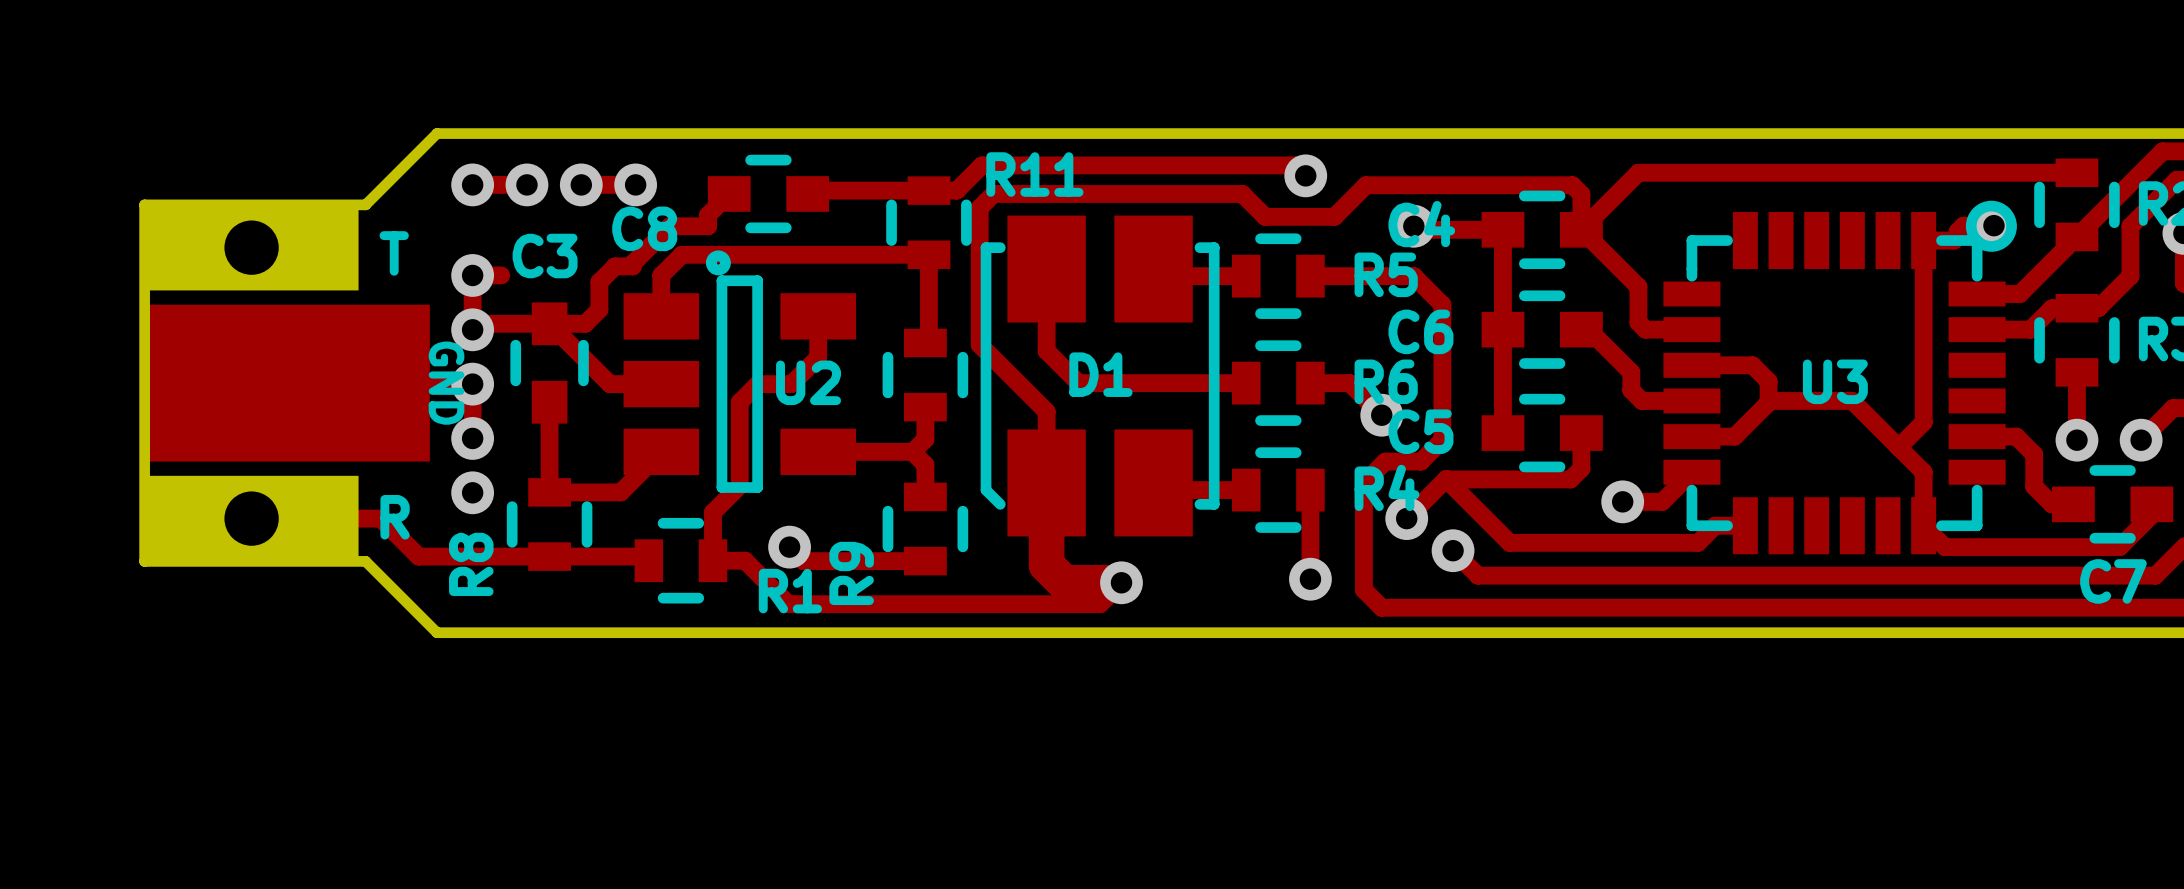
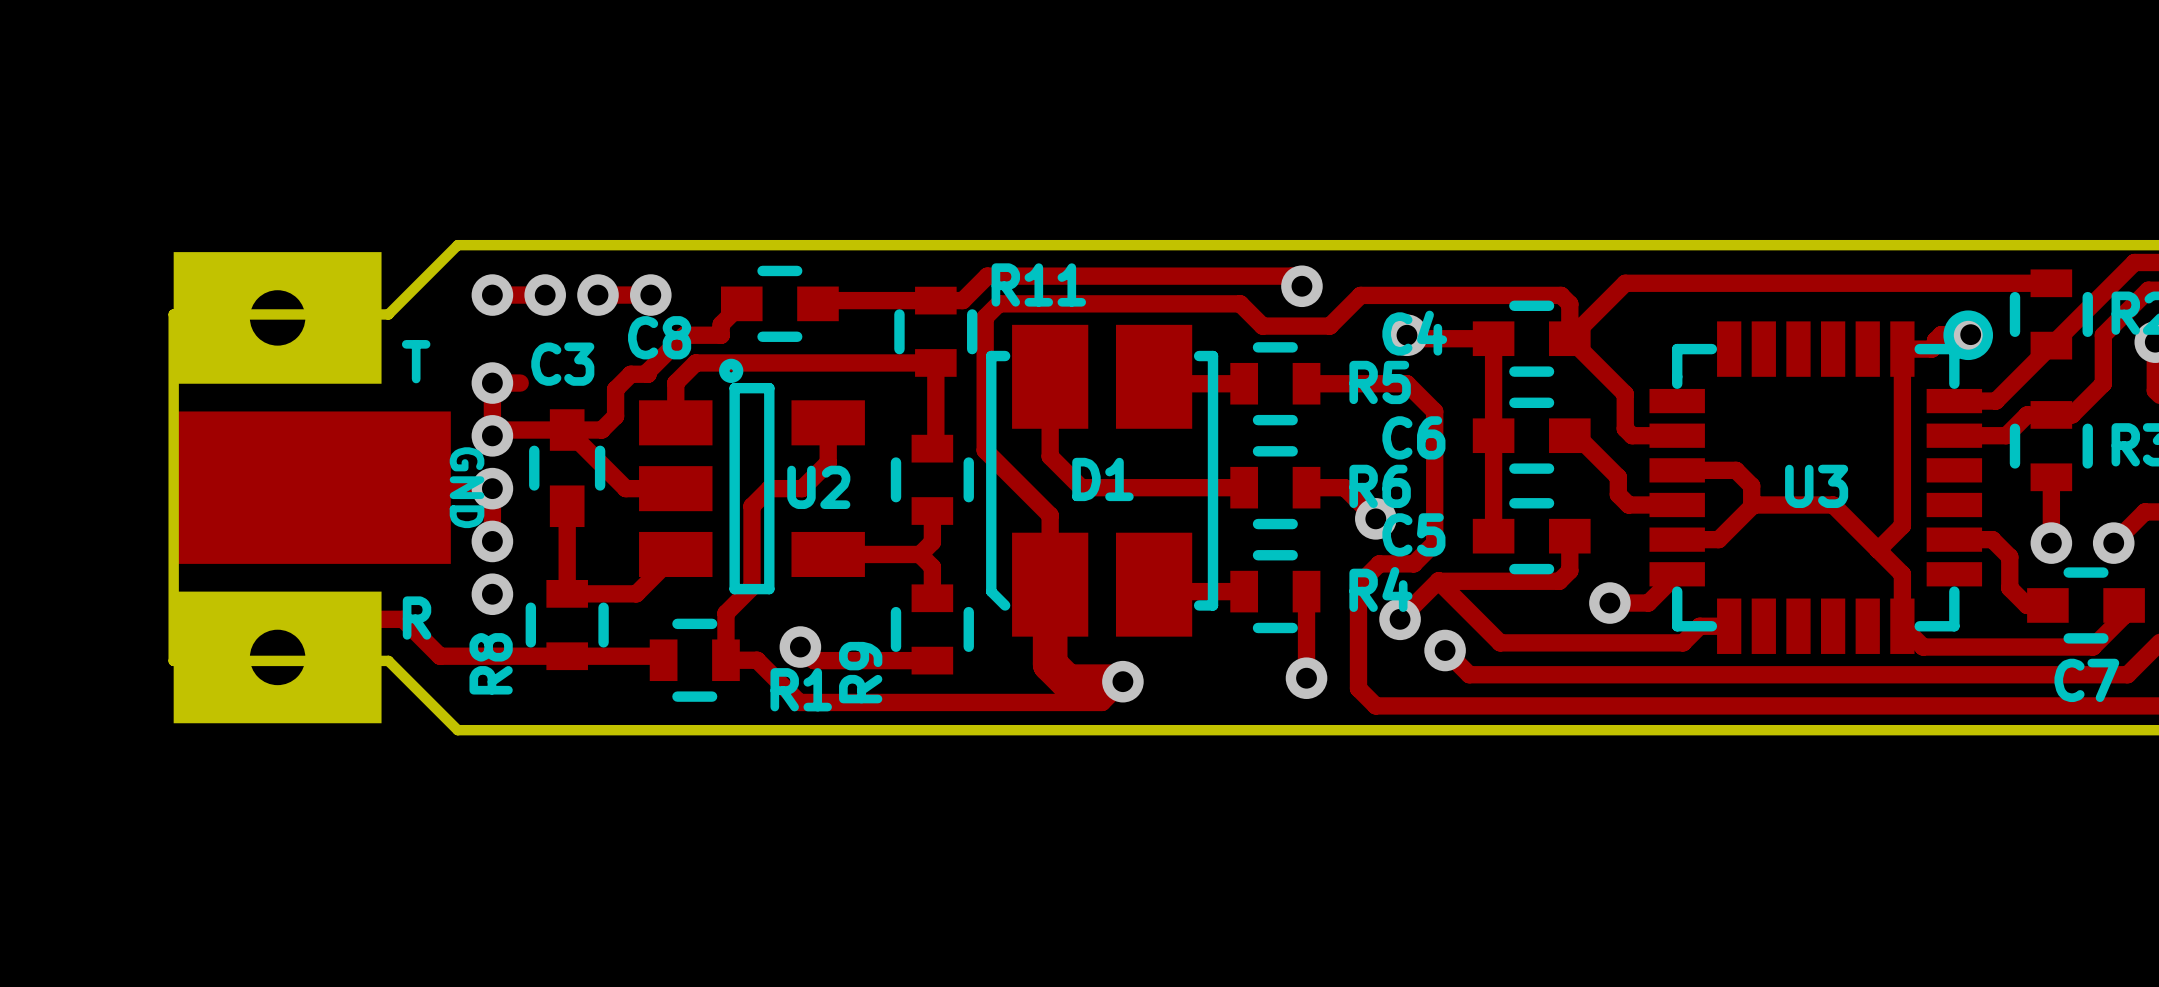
part footprint: [144, 204, 430, 562] -> [173, 252, 451, 724]

